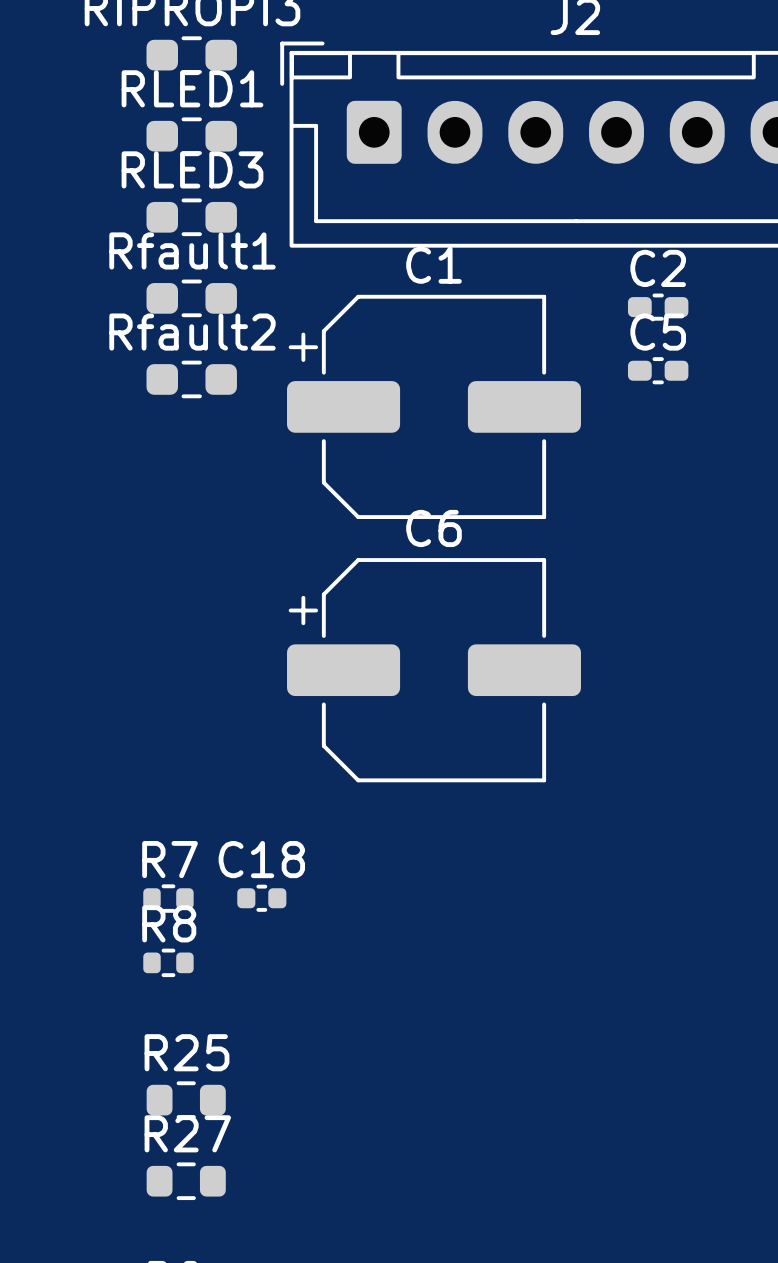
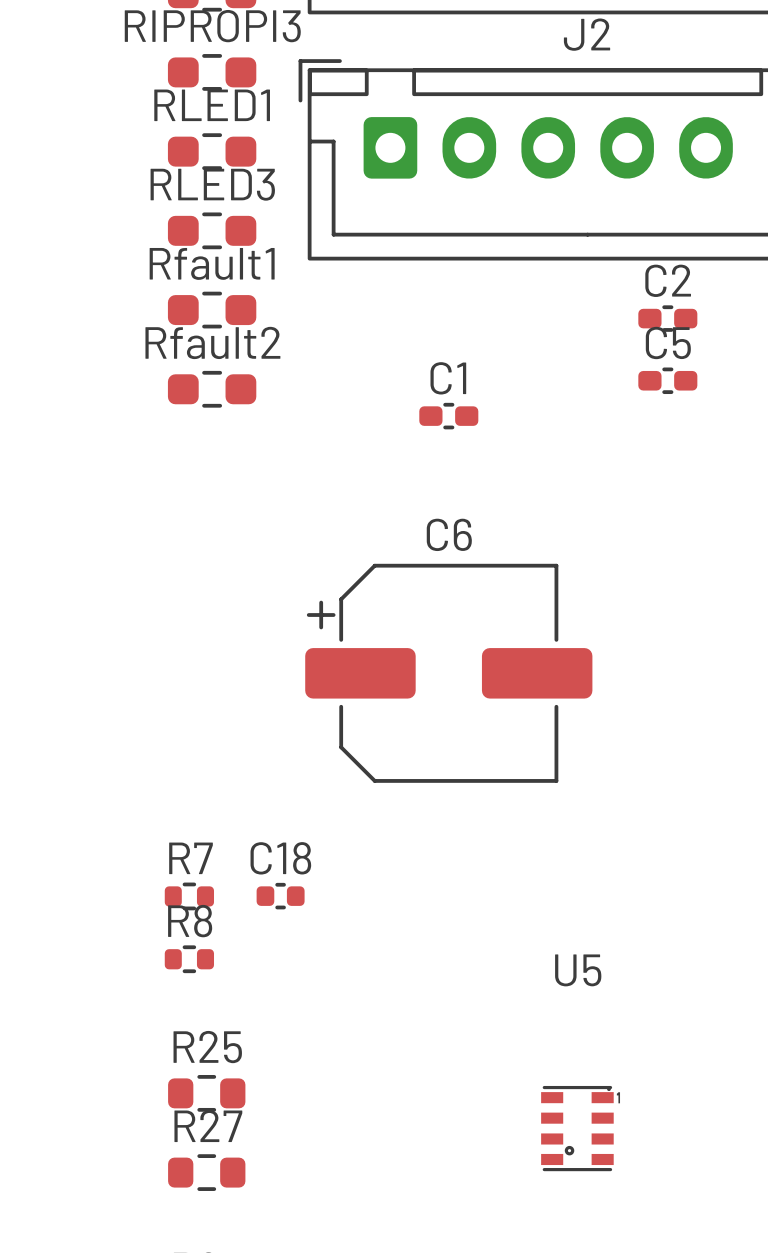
C1 name position: C1 (434, 265) -> C1 (448, 378)
C1 footprint: [287, 294, 581, 520] -> [419, 402, 479, 430]
U5: none -> (580, 1128)

